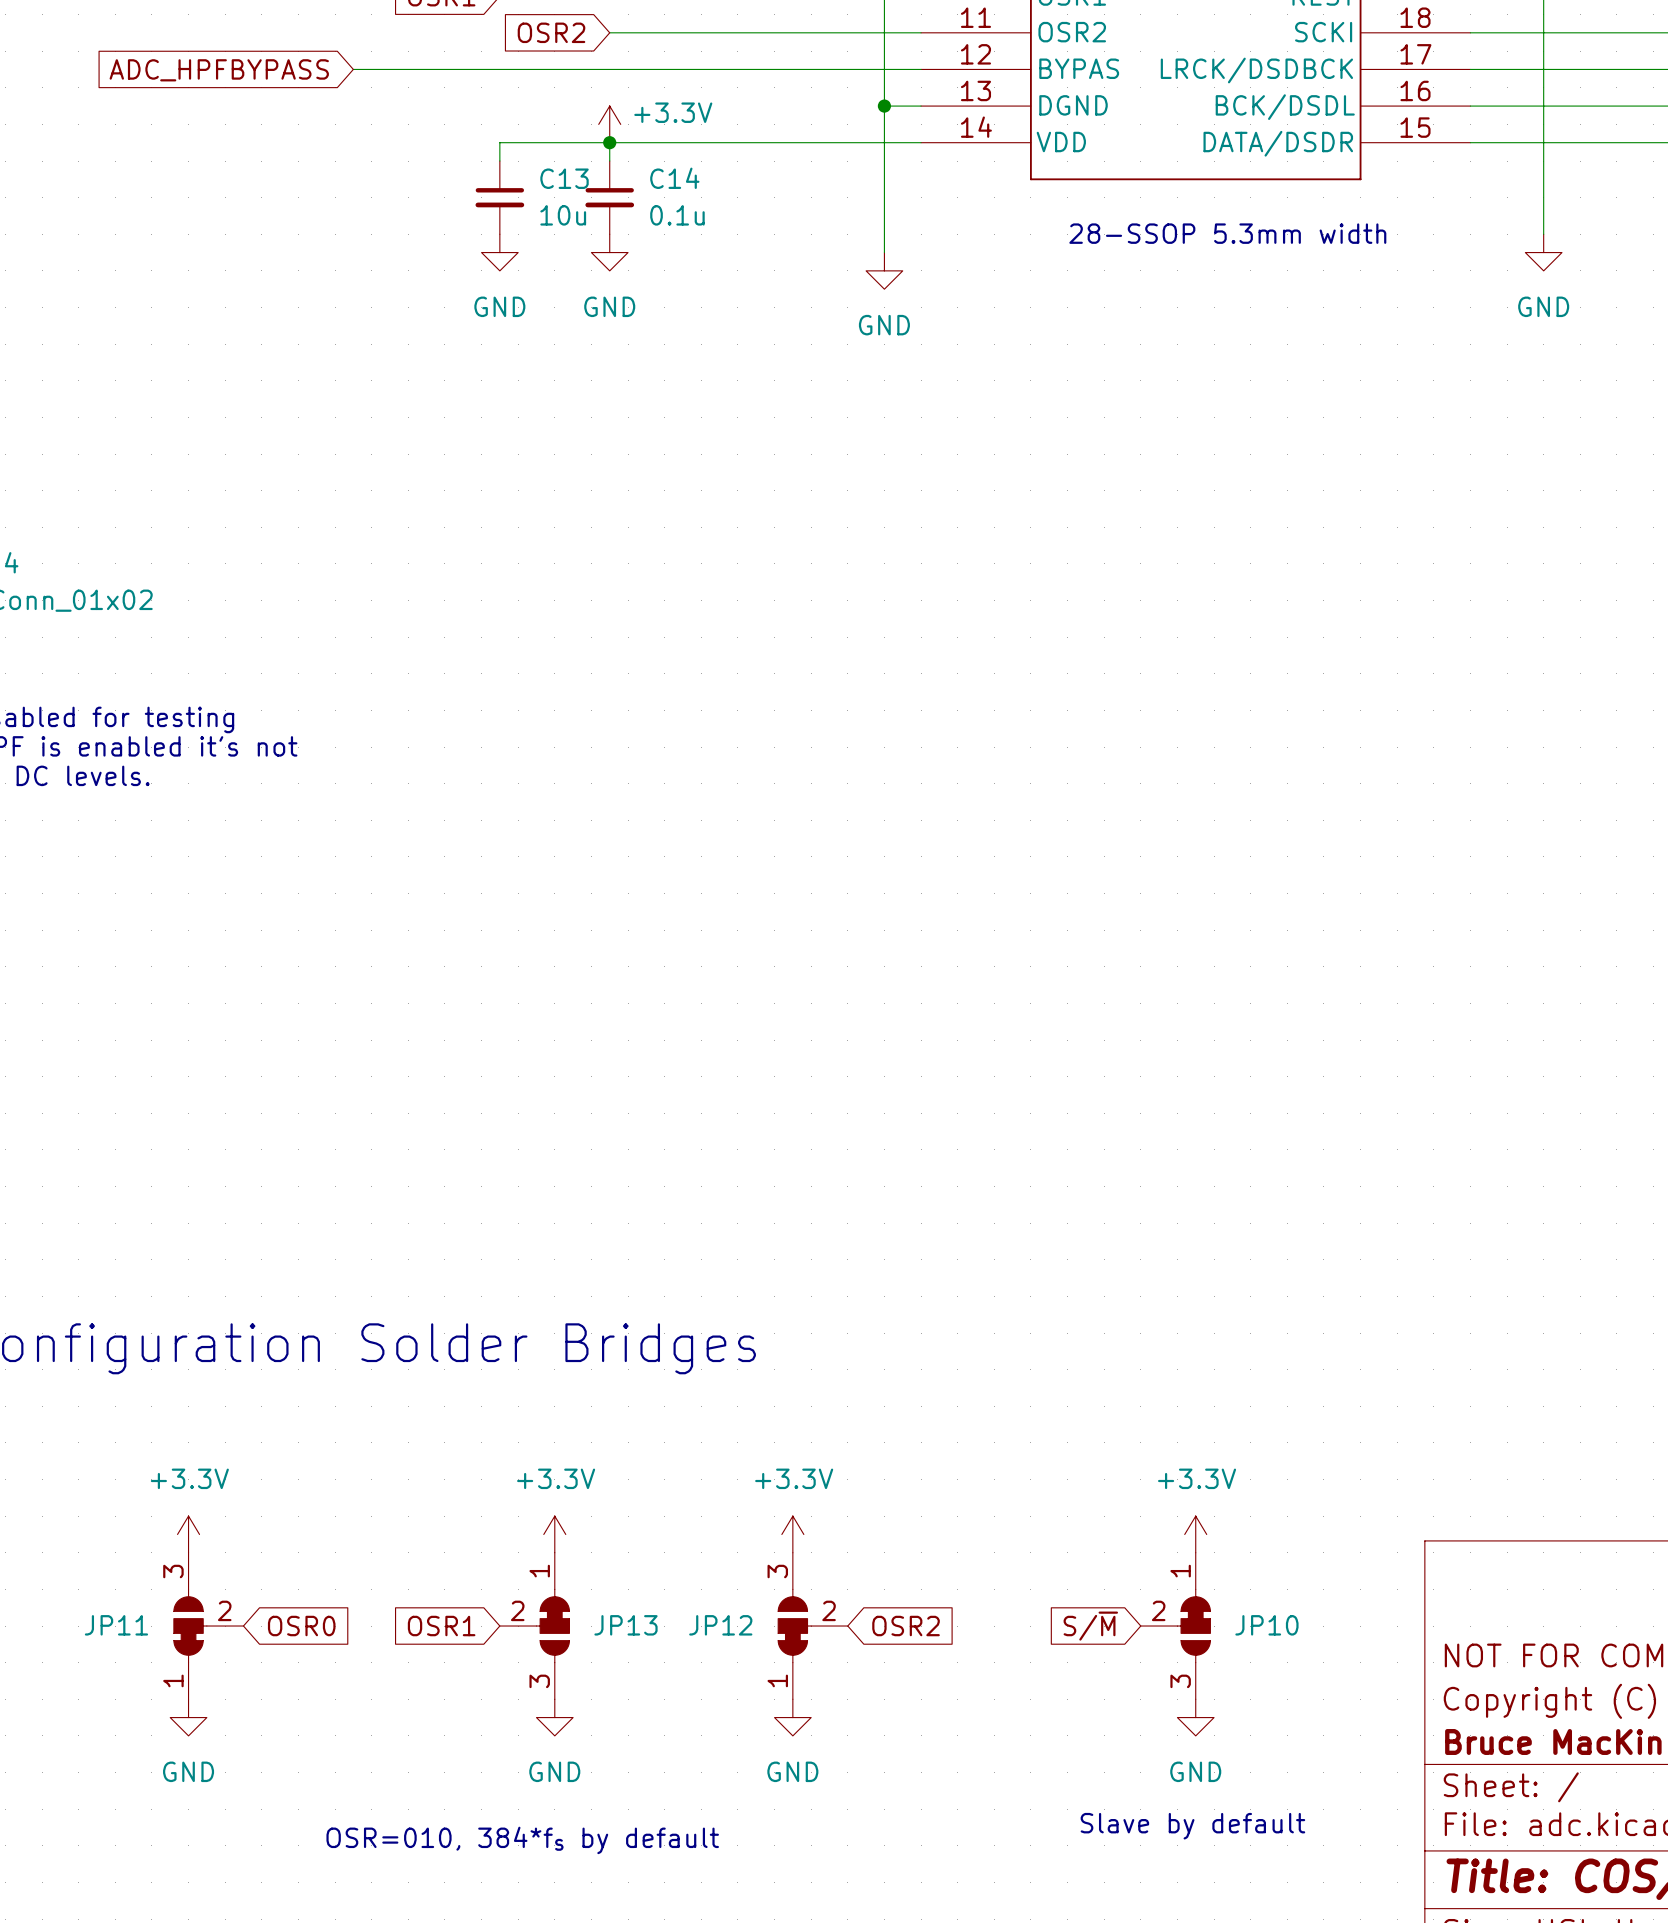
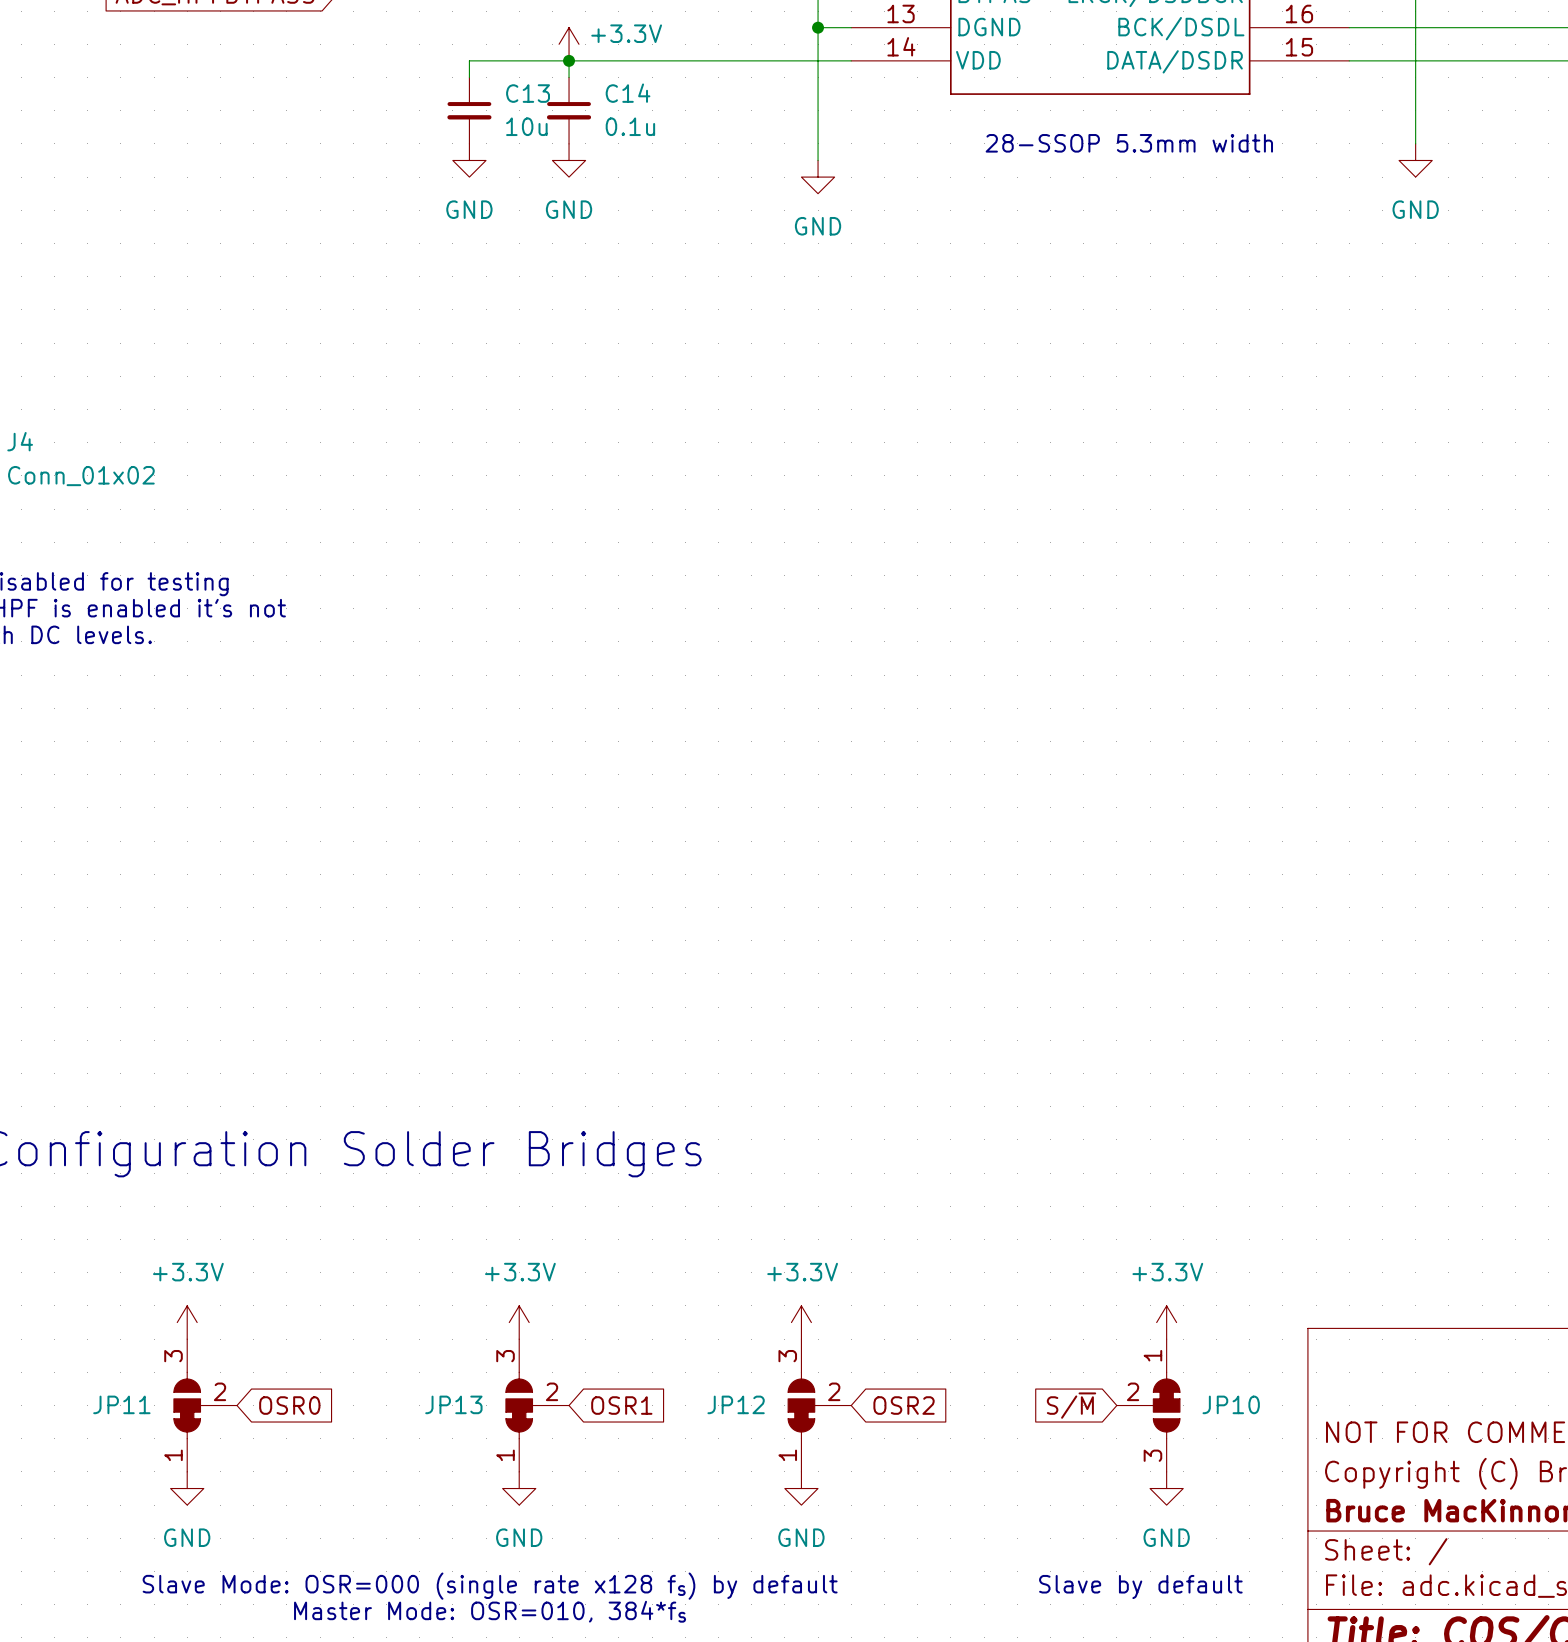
power symbol position: +3.3V (792, 1534) -> +3.3V (801, 1322)
power symbol position: +3.3V (1195, 1534) -> +3.3V (1166, 1322)
global label rotation: 0° (441, 1626) -> 180° (621, 1405)
global label position: OSR1 (441, 1626) -> OSR1 (621, 1405)
JP13 rotation: 0° (552, 1626) -> 180° (520, 1405)
JP12 position: (813, 1626) -> (819, 1405)
global label position: OSR2 (906, 1626) -> OSR2 (904, 1405)
global label position: S/~{M} (1090, 1626) -> S/~{M} (1071, 1405)
JP10 position: (1175, 1626) -> (1148, 1405)
power symbol position: GND (792, 1717) -> GND (801, 1488)
power symbol position: GND (1195, 1717) -> GND (1166, 1488)
text: none -> Slave Mode: OSR=000 (single rate x128 fs) by default (490, 1586)
text position: Slave by default (1192, 1826) -> Slave by default (1140, 1587)
text: OSR=010, 384*fs by default (522, 1840) -> none
text: none -> Master Mode: OSR=010, 384*fs (490, 1611)

